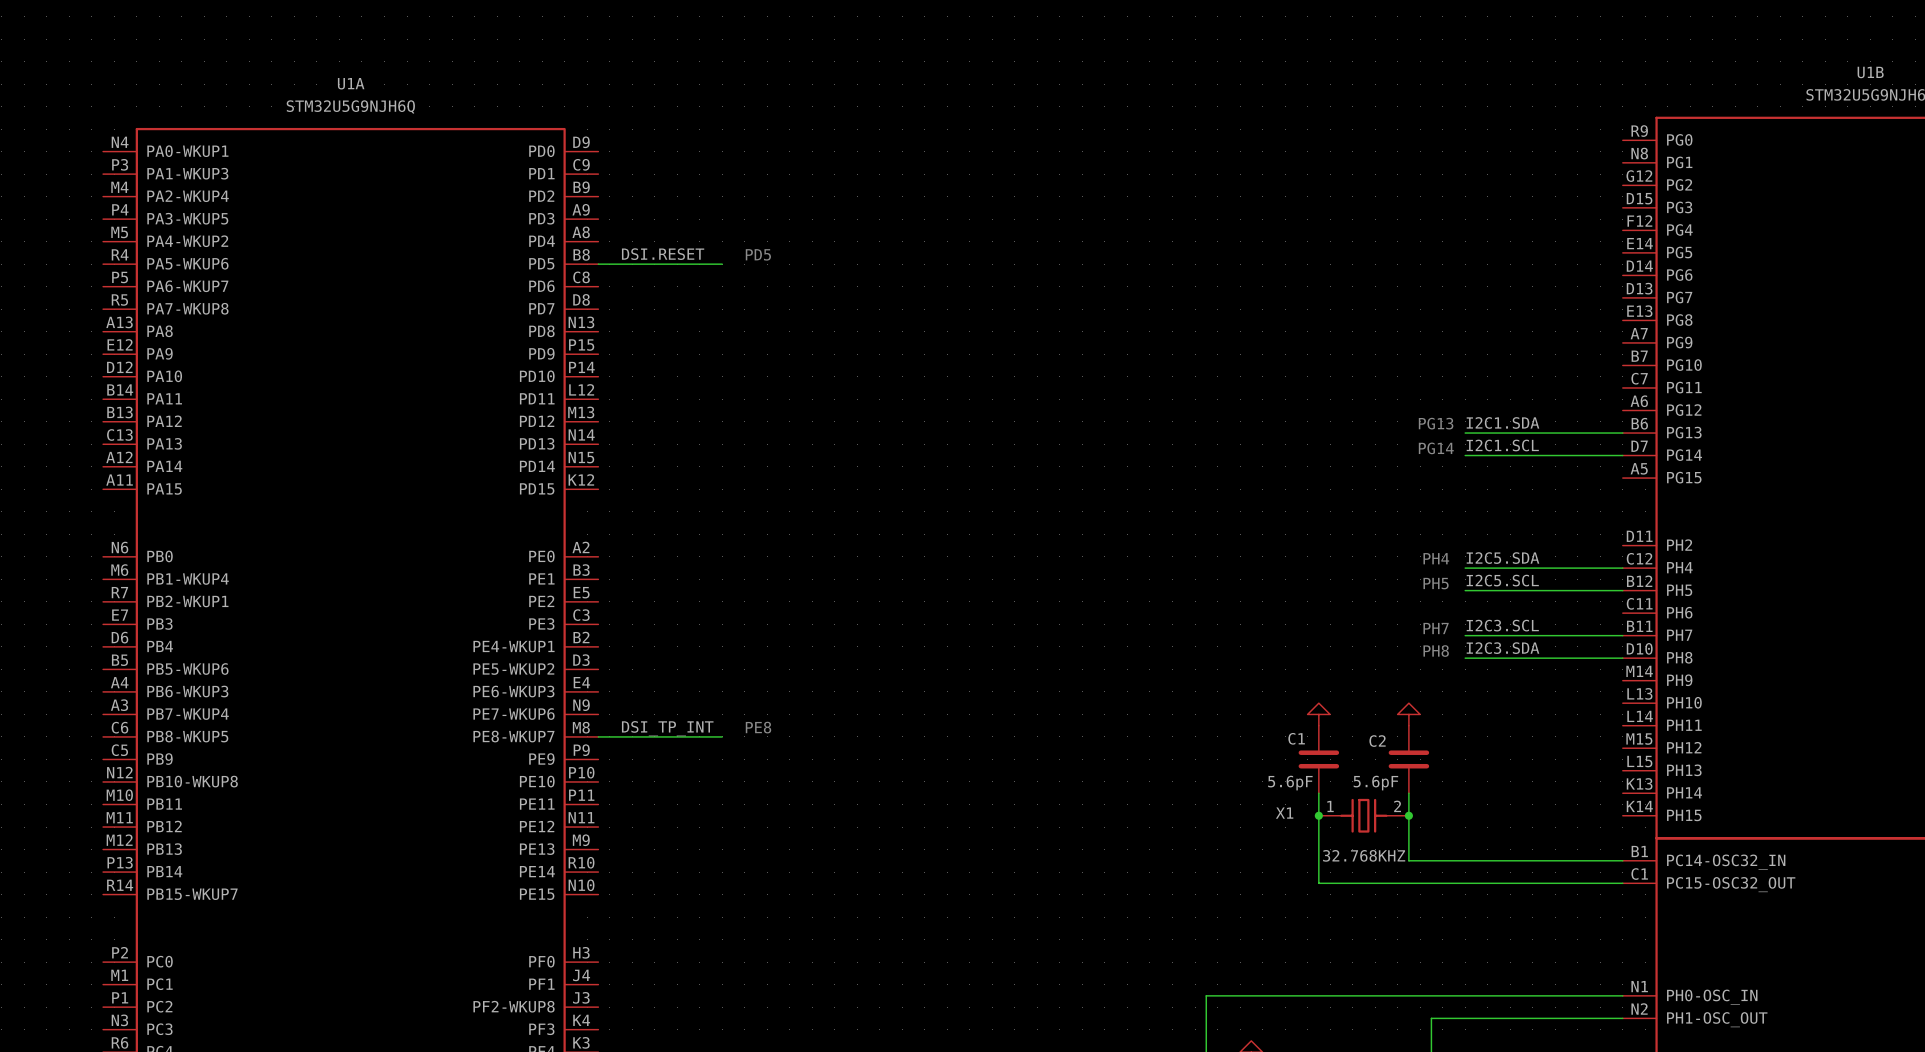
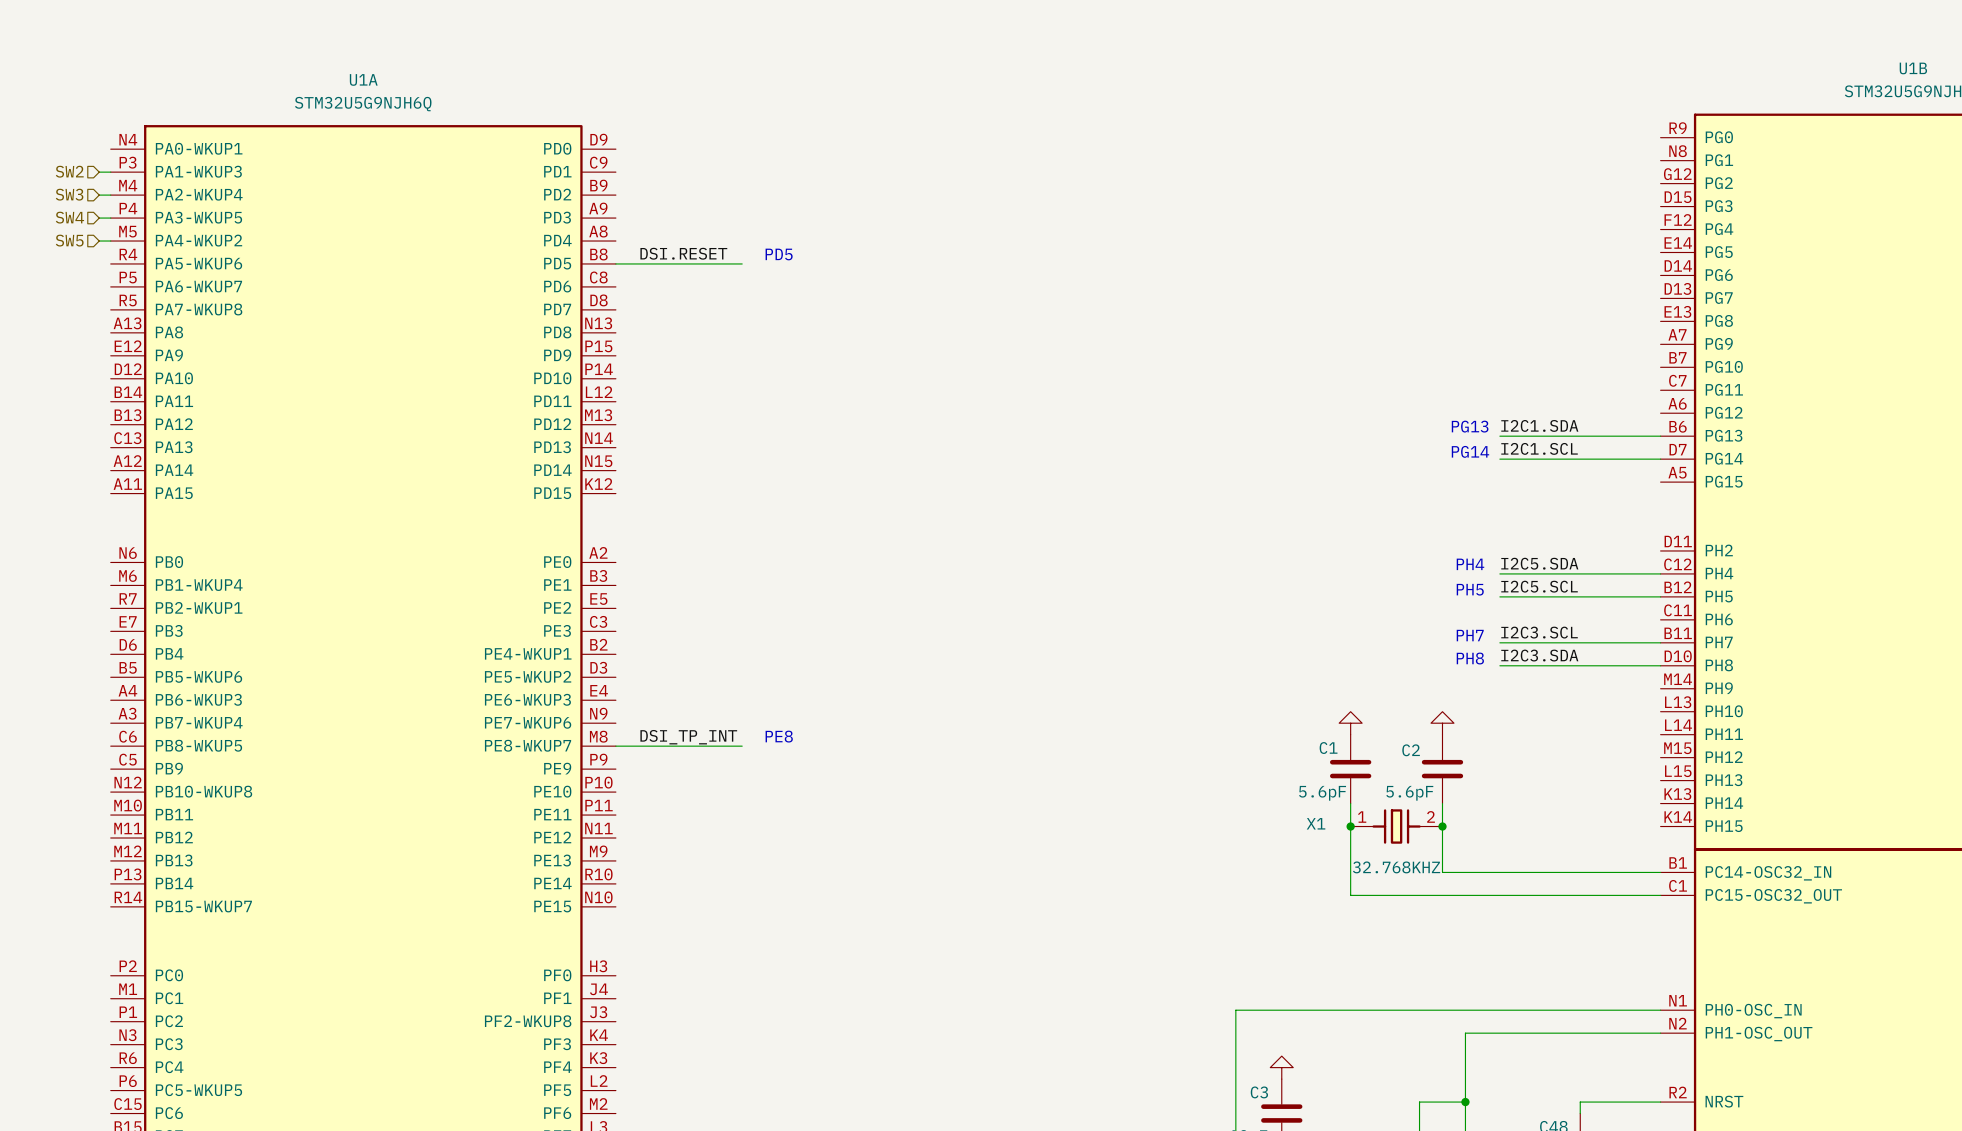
hierarchical label: none -> SW2 (69, 171)
wire: none -> (99, 172) (110, 172)
hierarchical label: none -> SW3 (69, 194)
wire: none -> (99, 195) (110, 195)
hierarchical label: none -> SW4 (69, 217)
wire: none -> (99, 218) (110, 218)
hierarchical label: none -> SW5 (69, 240)
wire: none -> (99, 241) (110, 241)

